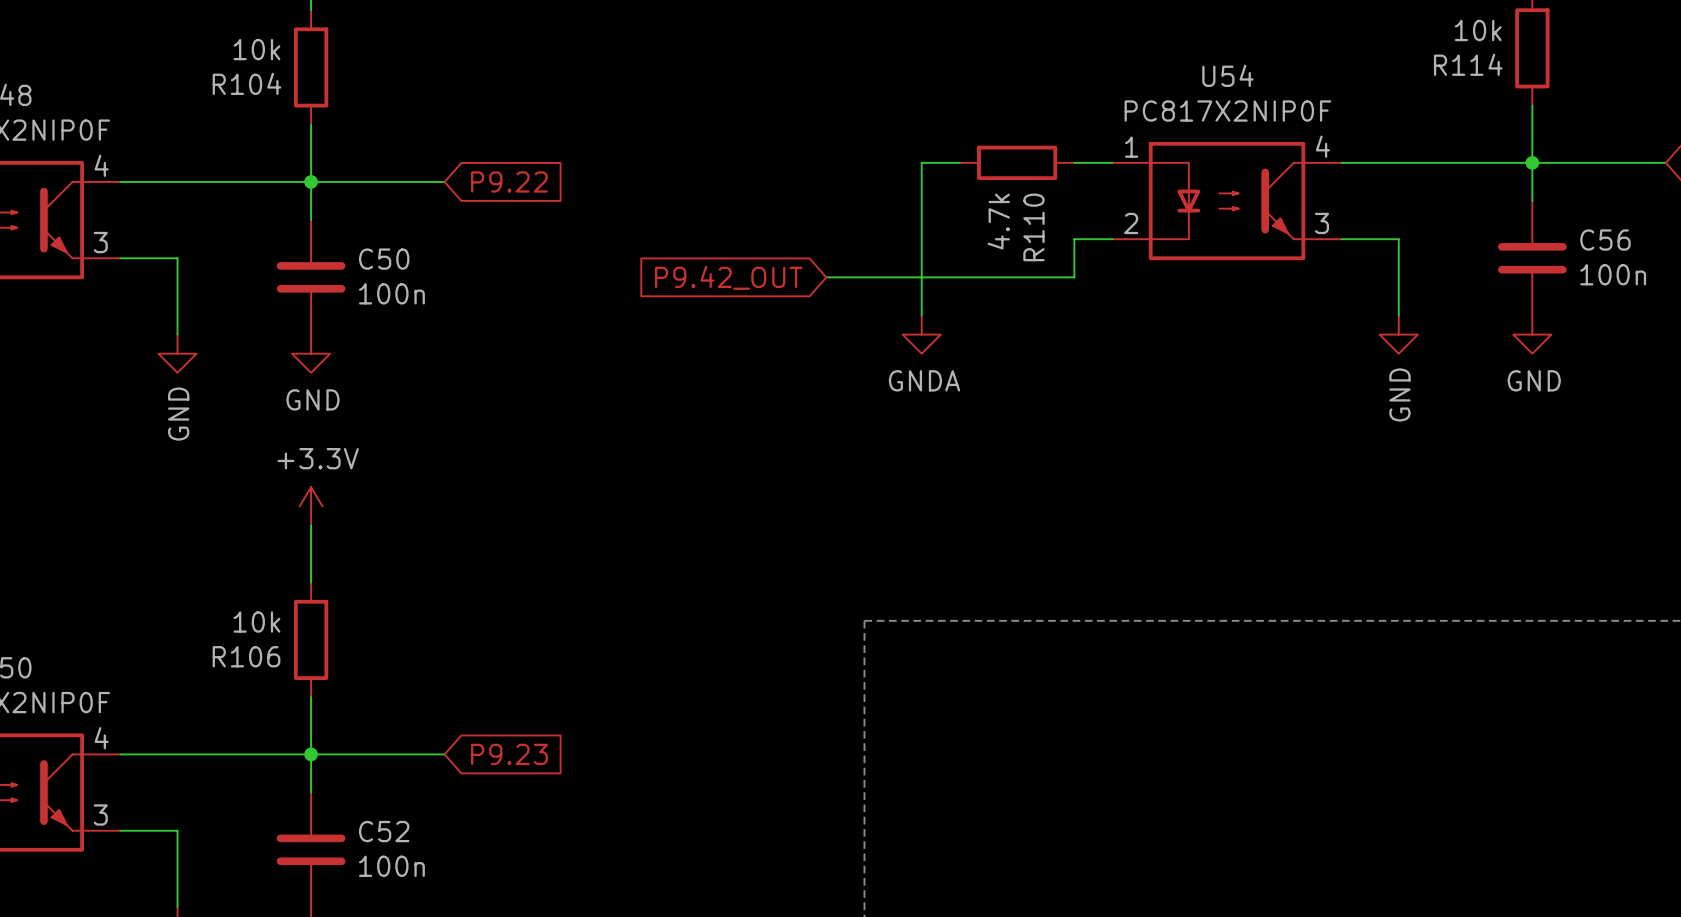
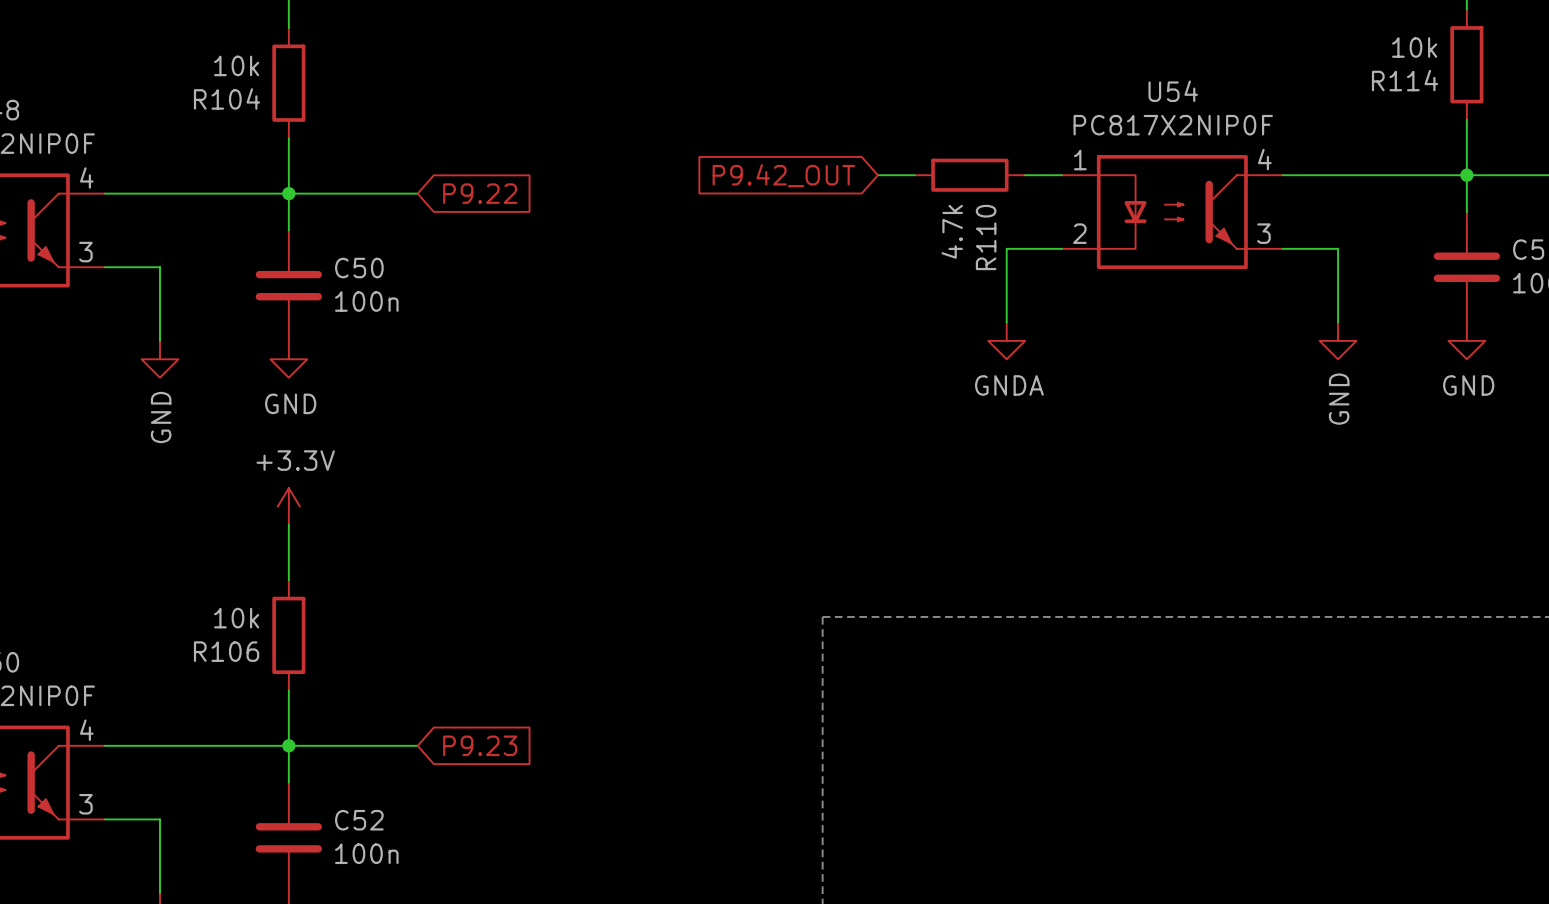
wire: (921, 162) (921, 315) -> none
wire: (1074, 239) (1074, 277) (826, 277) -> (1025, 248) (1006, 248) (1006, 322)
global label position: P9.42_OUT (728, 277) -> P9.42_OUT (783, 175)
power symbol position: GNDA (921, 334) -> GNDA (1006, 340)

